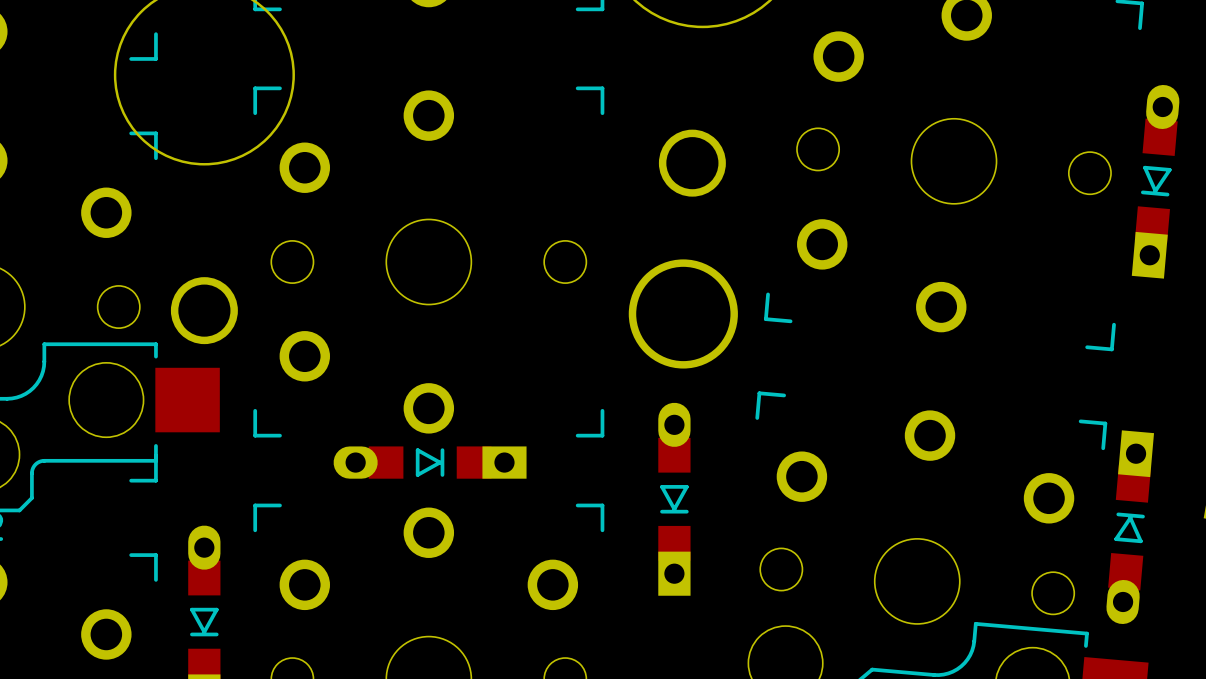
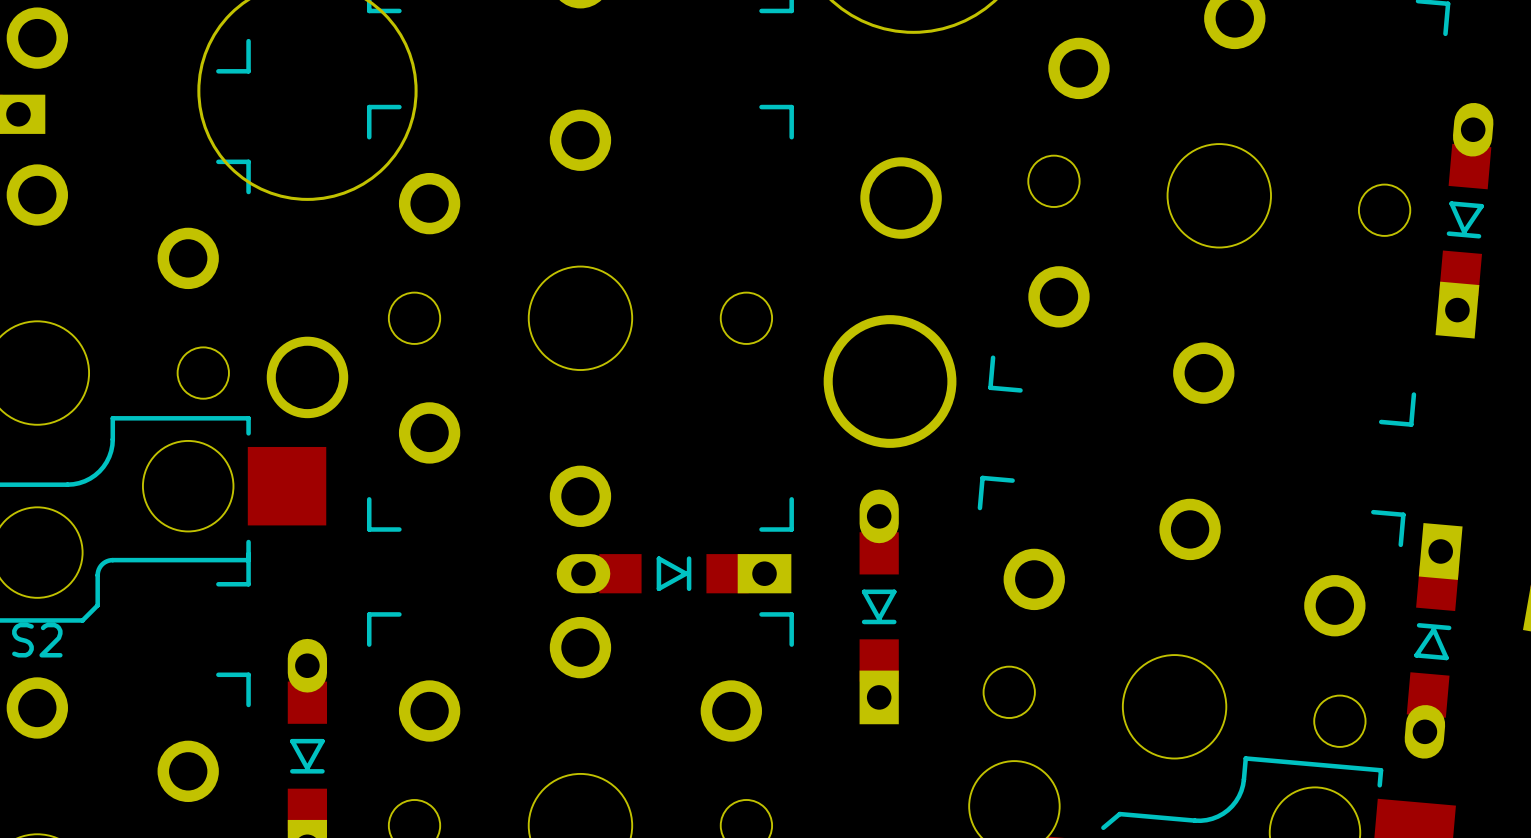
part position: (430, 462) -> (674, 573)

